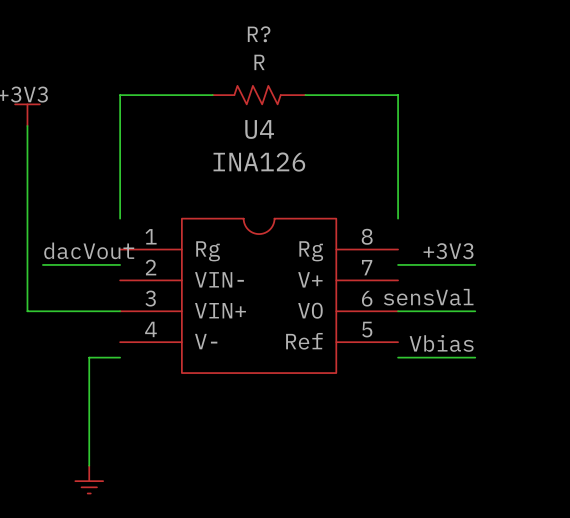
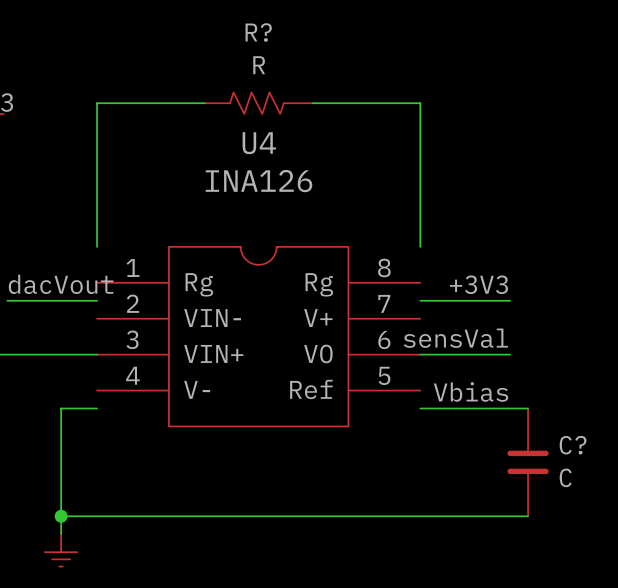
wire: none -> (510, 408) (528, 408)
C?: none -> C (528, 462)
wire: none -> (61, 516) (528, 516)
junction: none -> (61, 516)

